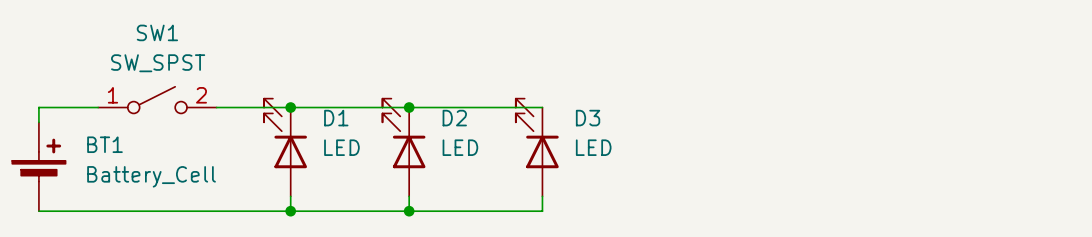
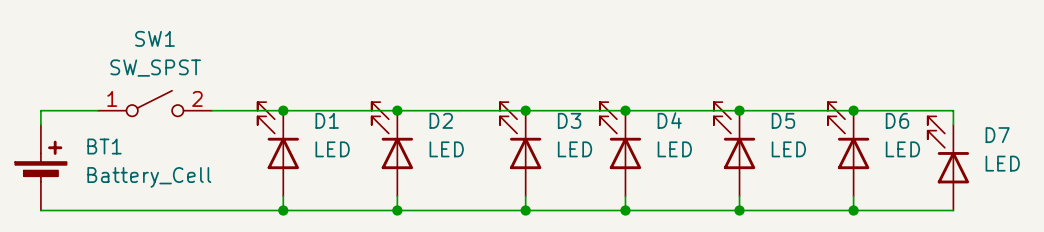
wire: none -> (525, 110) (953, 110) (953, 124)
junction: none -> (525, 110)
junction: none -> (625, 110)
junction: none -> (739, 110)
junction: none -> (853, 110)
D4: none -> LED (620, 149)
D5: none -> LED (734, 149)
D6: none -> LED (848, 149)
D7: none -> LED (948, 163)
wire: none -> (625, 196) (625, 210)
wire: none -> (739, 196) (739, 210)
wire: none -> (853, 196) (853, 210)
wire: none -> (525, 210) (953, 210)
junction: none -> (525, 210)
junction: none -> (625, 210)
junction: none -> (739, 210)
junction: none -> (853, 210)

